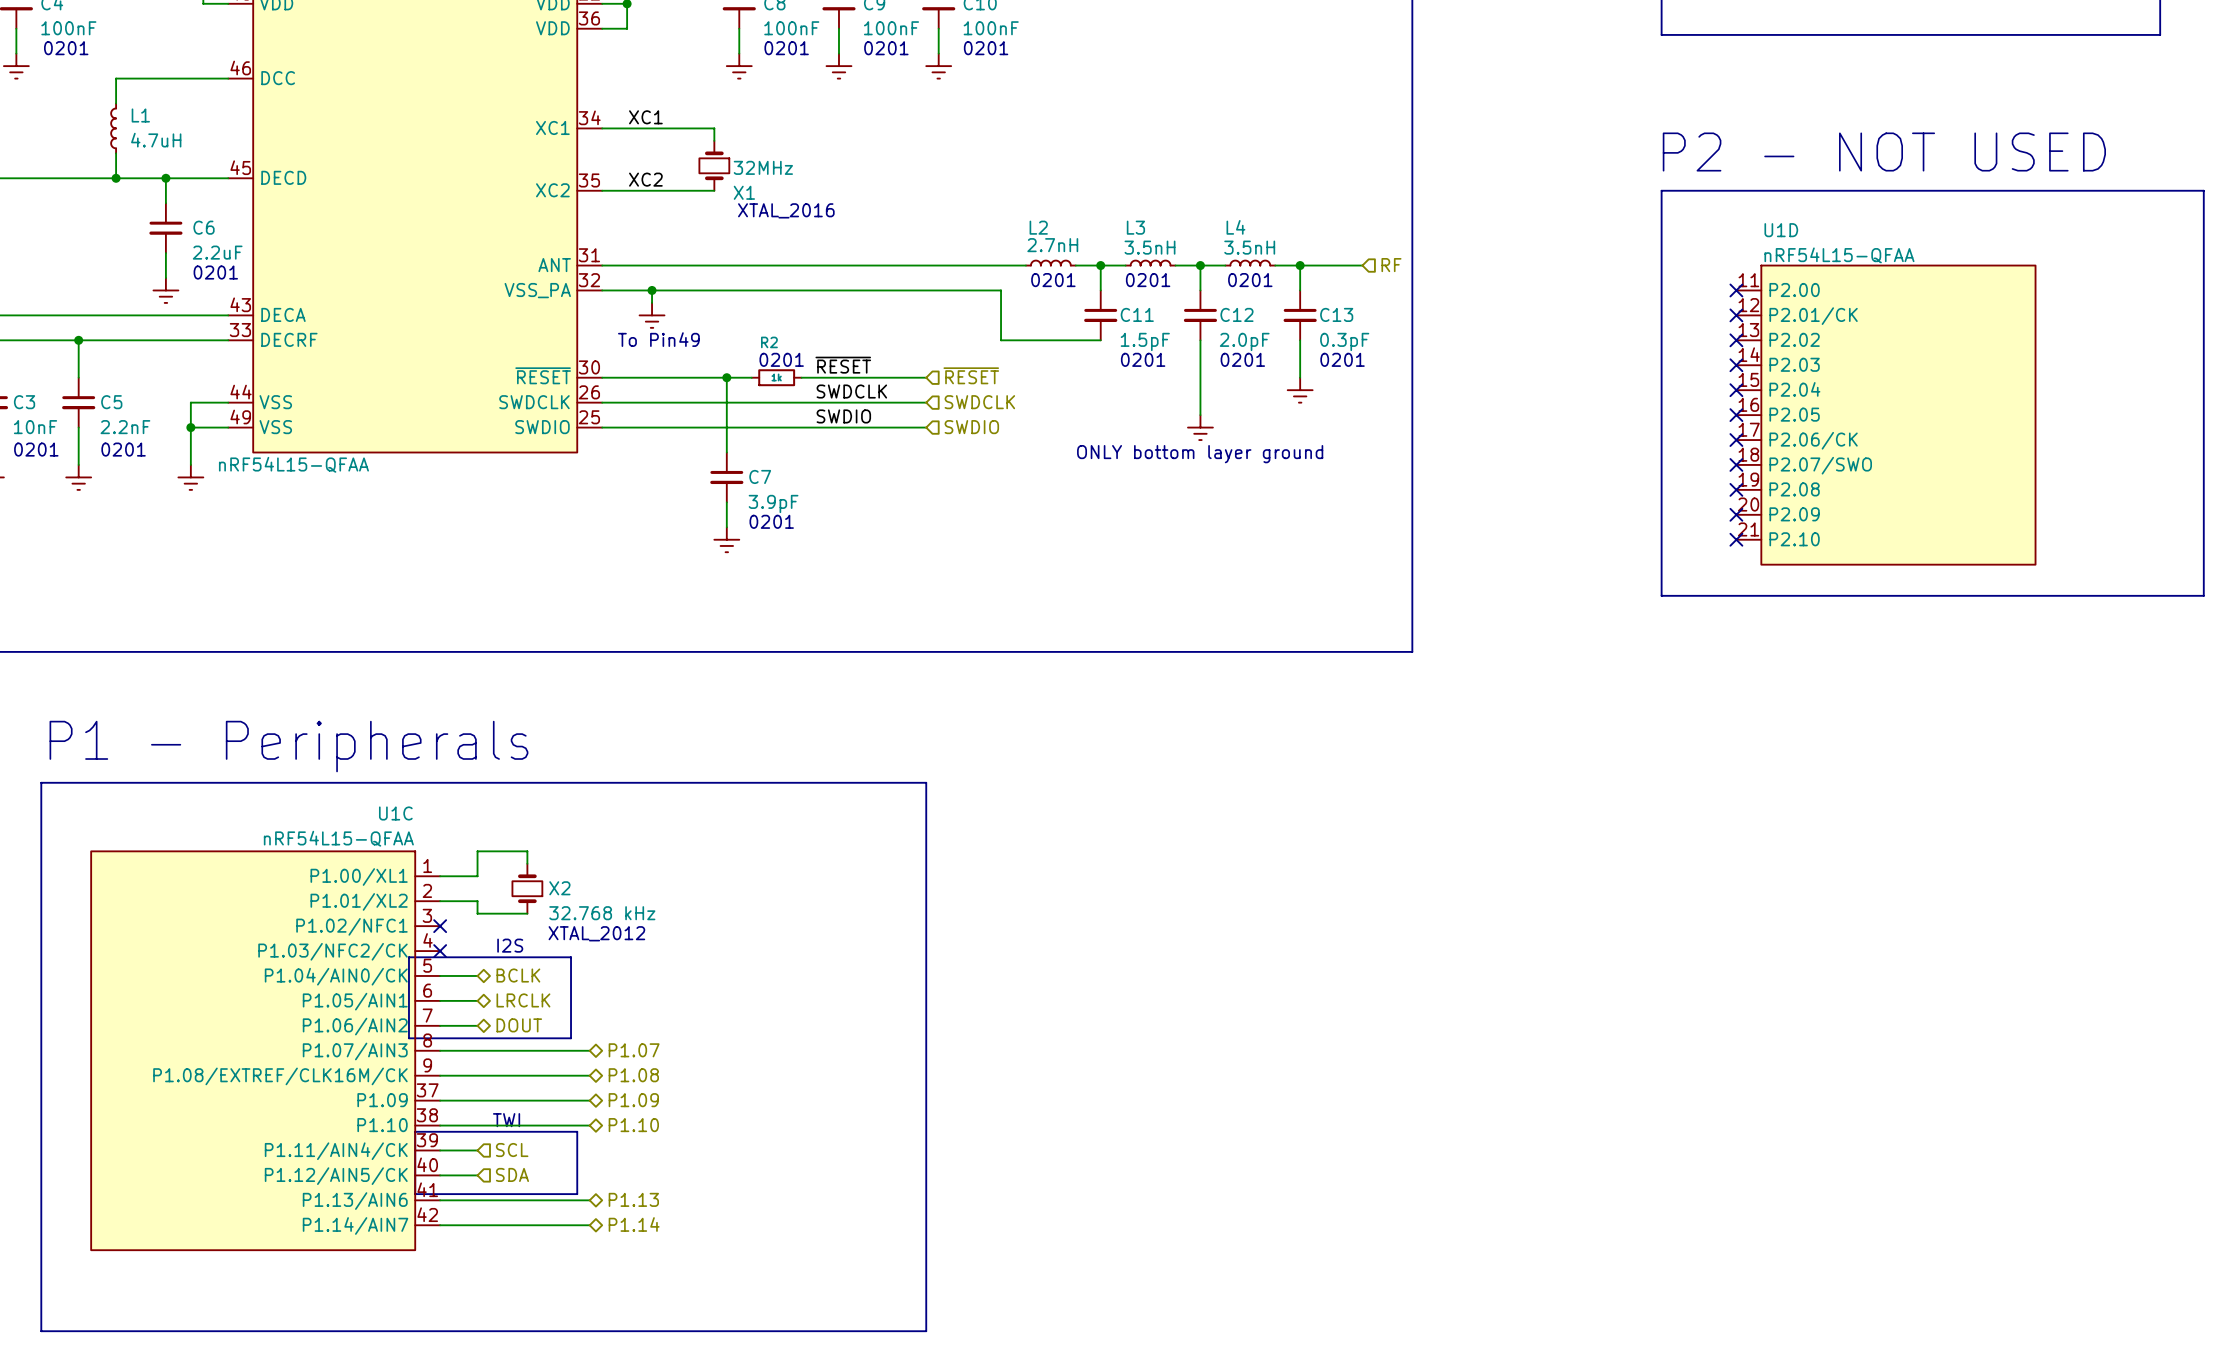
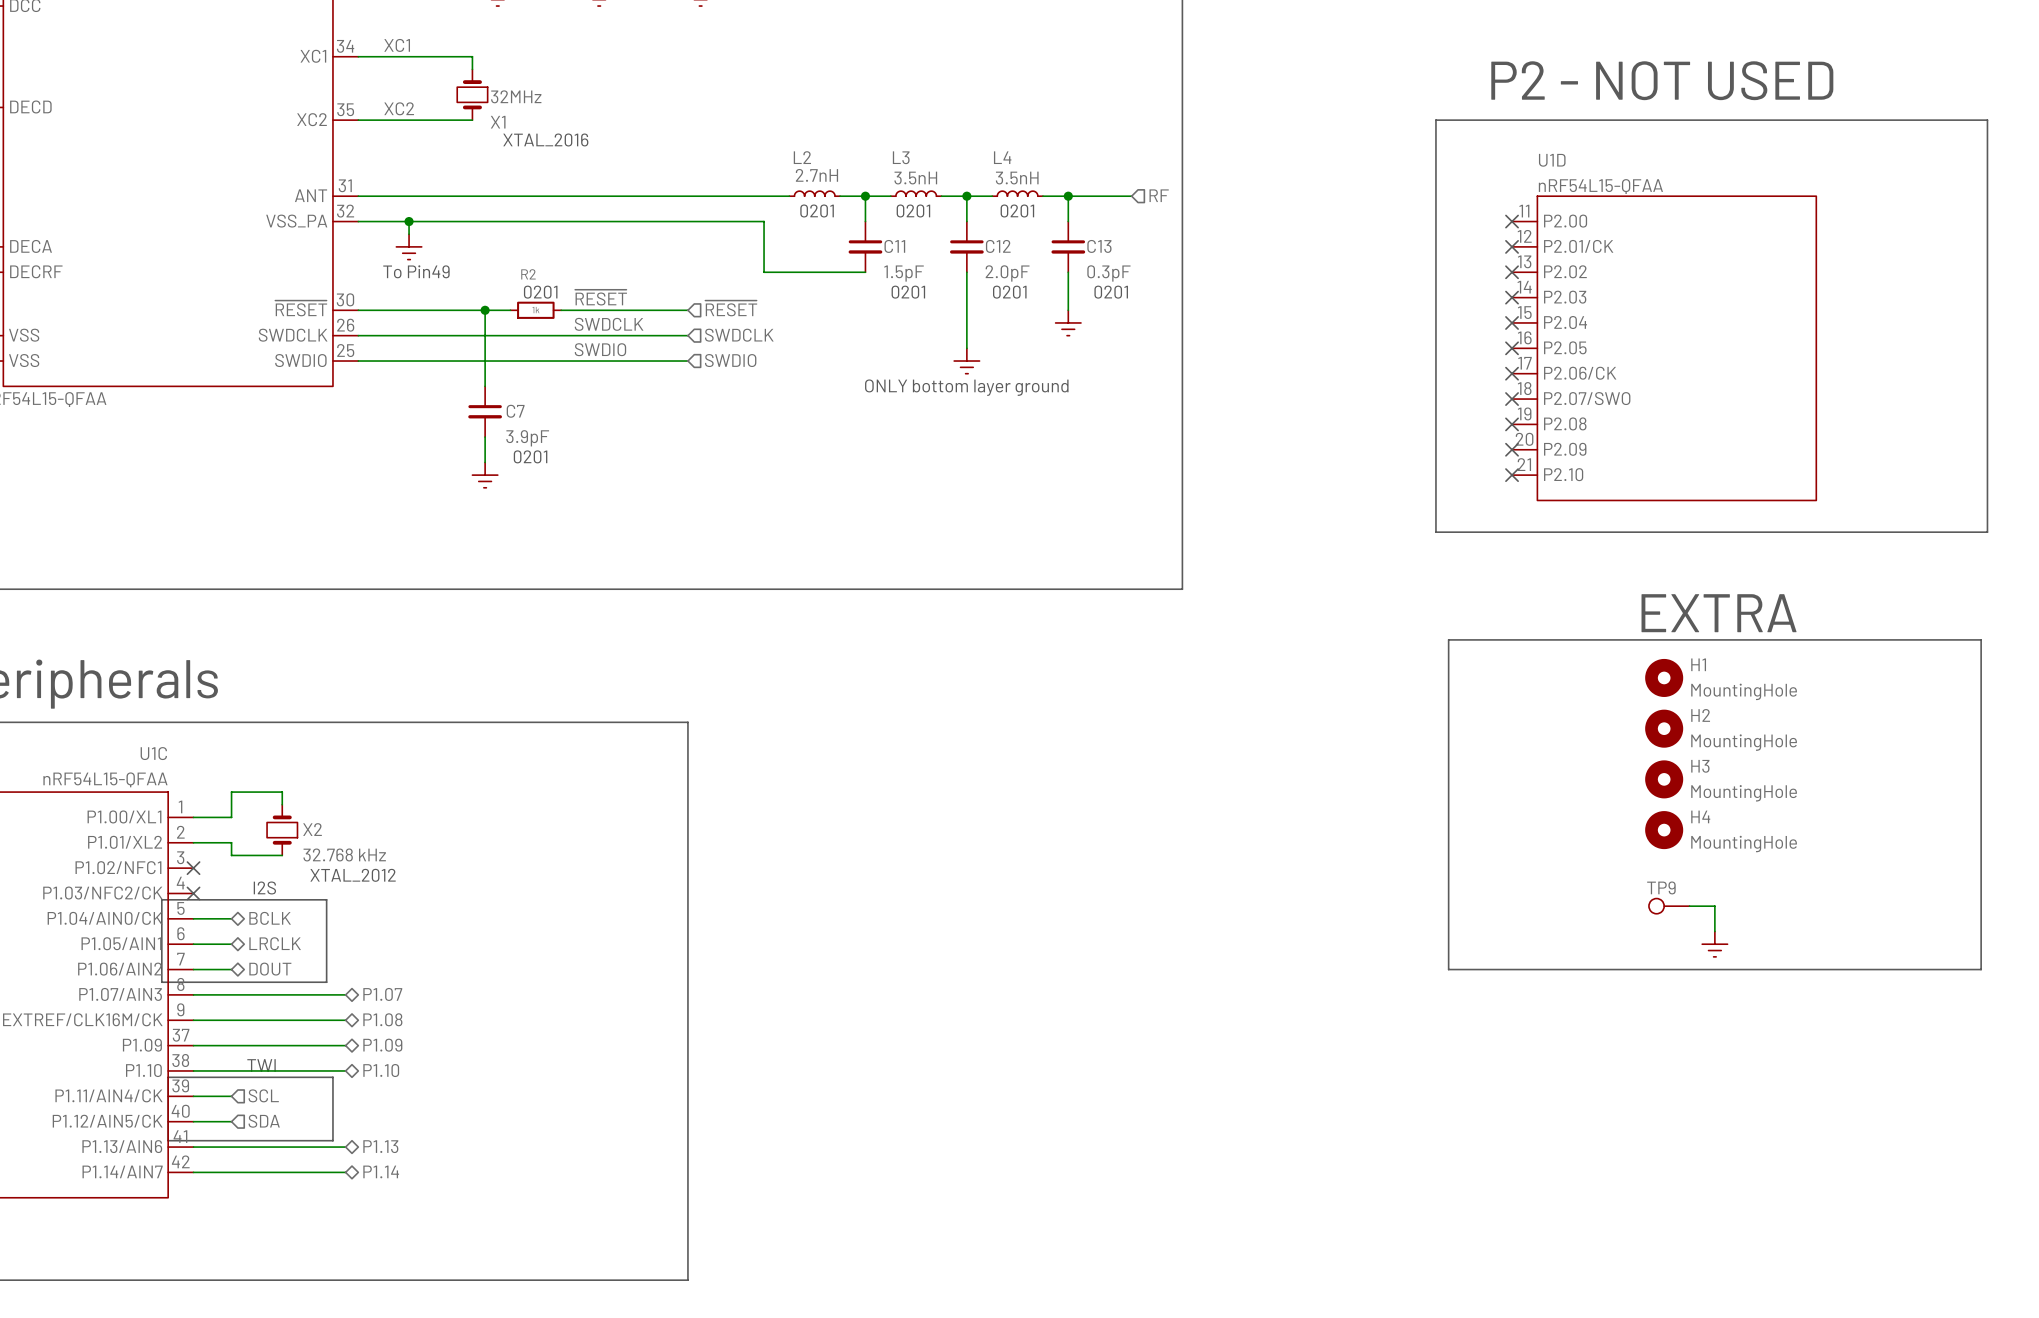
text: none -> EXTRA (1719, 613)
line: none -> (1448, 639) (1981, 639) (1981, 969) (1448, 969) (1448, 639)
H1: none -> MountingHole (1664, 677)
H2: none -> MountingHole (1664, 728)
H3: none -> MountingHole (1664, 779)
H4: none -> MountingHole (1664, 830)
TP9: none -> (1669, 906)
wire: none -> (1689, 906) (1714, 906) (1714, 931)
power symbol: none -> (1714, 944)

